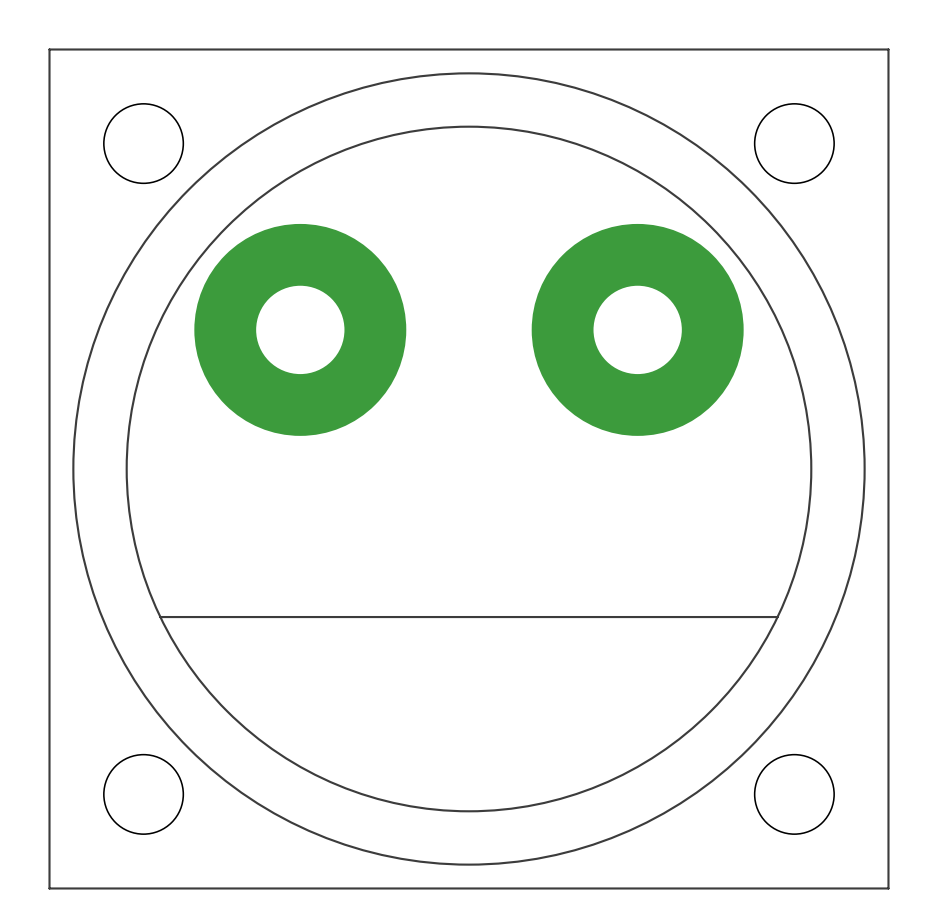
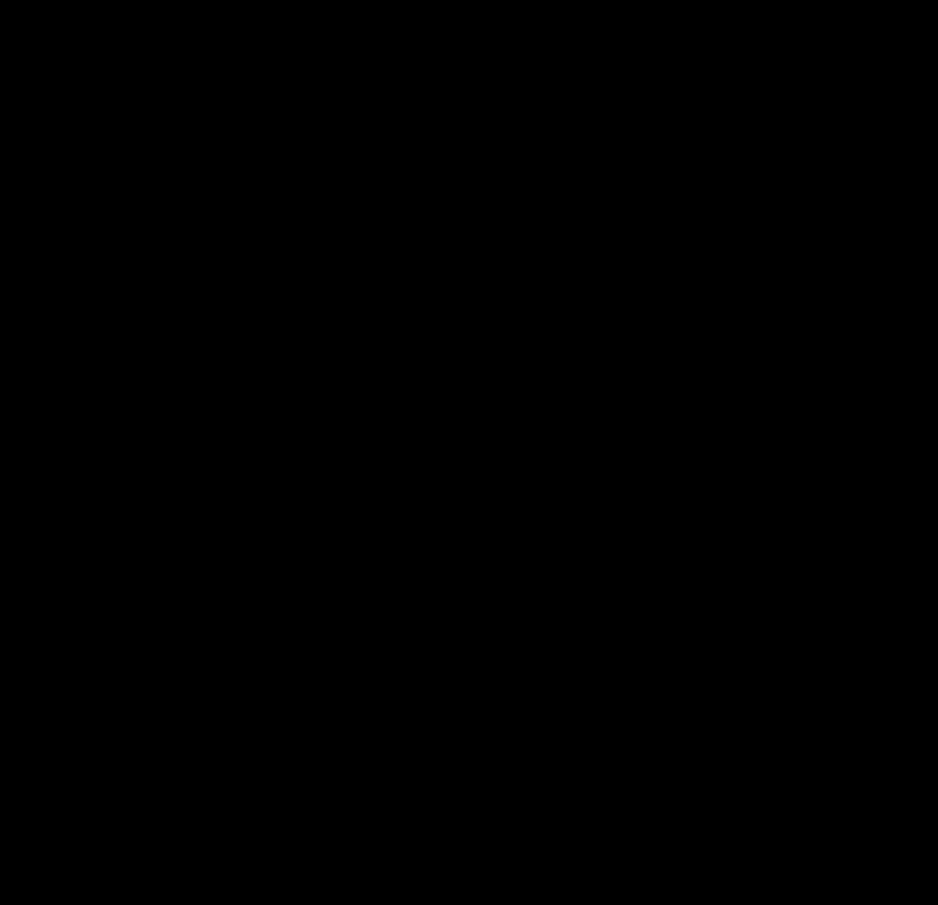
part: (468, 468) -> none

